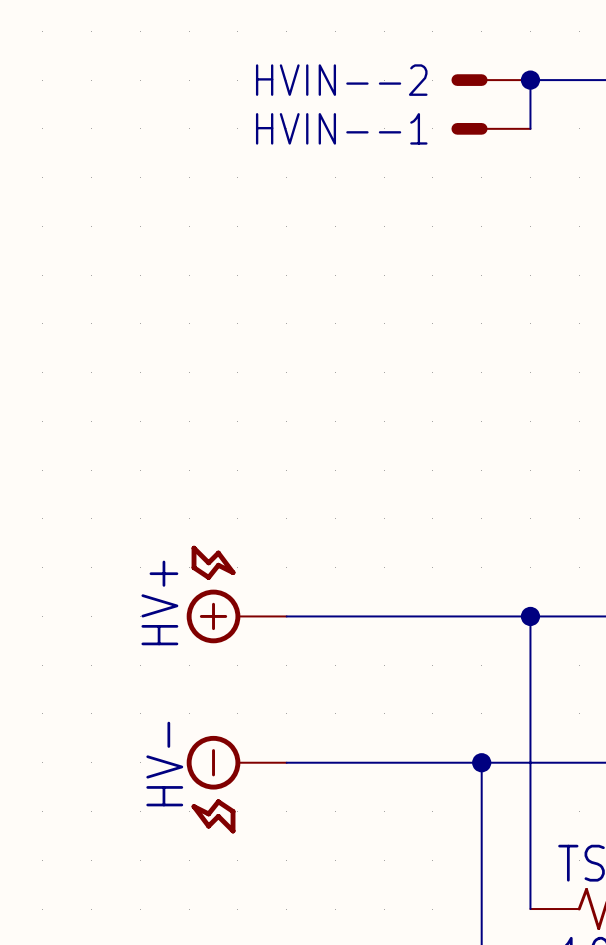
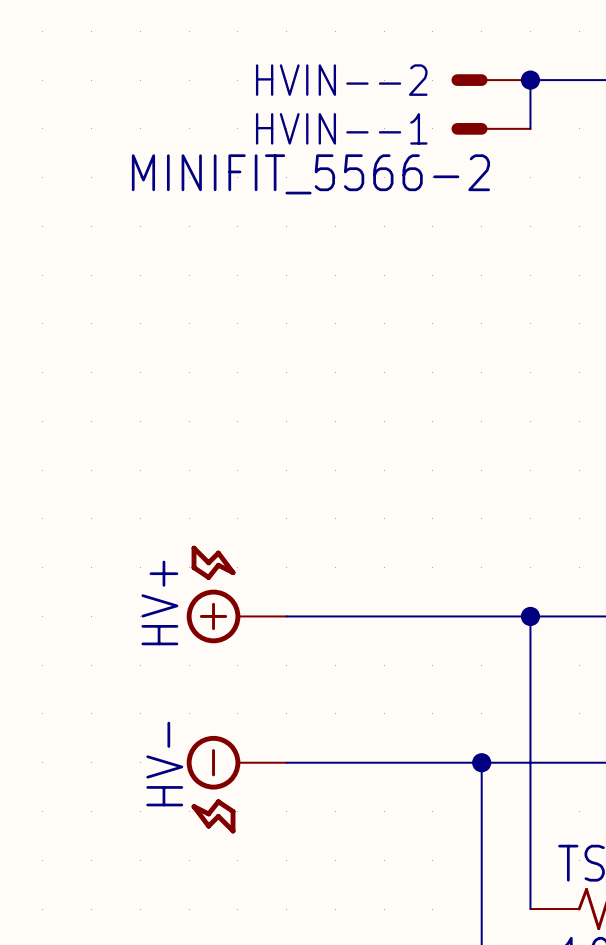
HVIN--1 value: none -> MINIFIT_5566-2 (310, 174)

